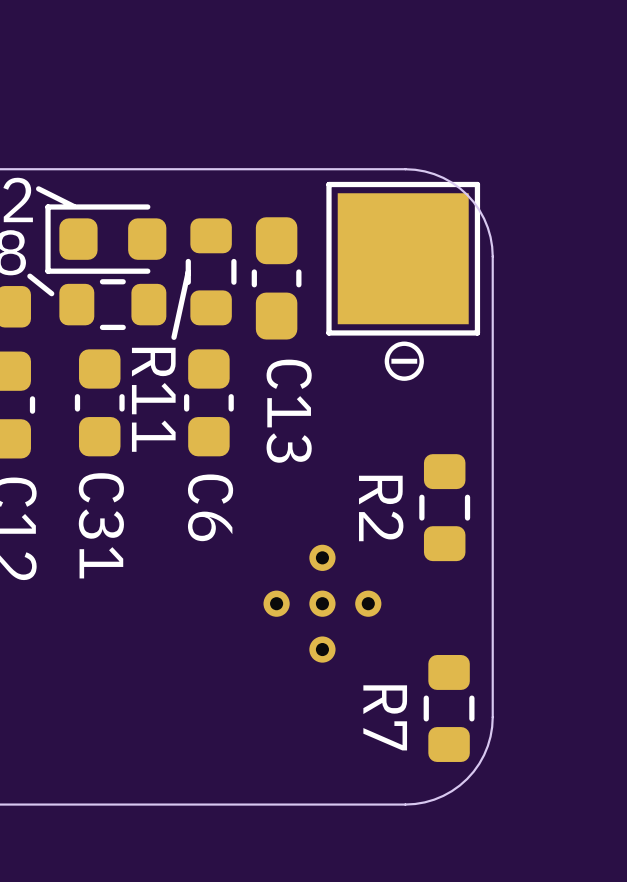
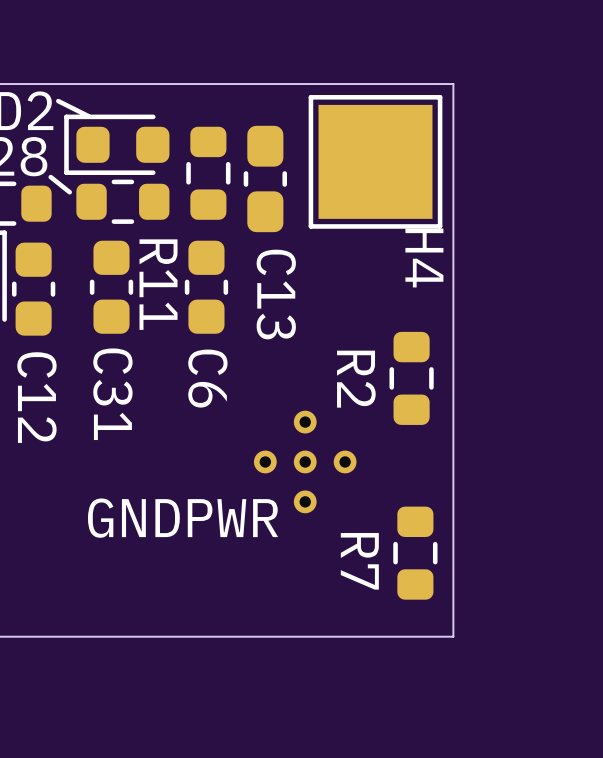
board edge: (405, 169) (424, 171) (443, 177) (467, 194) (484, 218) (490, 237) (492, 256) -> (377, 84) (453, 84) (453, 159)
line: (188, 271) (173, 337) -> none
text: ⊖ (404, 361) -> none
H4 name: none -> H4 (424, 257)
text: none -> GNDPWR (183, 518)
board edge: (492, 717) (490, 736) (484, 755) (467, 778) (451, 791) (434, 799) (405, 804) -> (453, 560) (453, 636) (377, 636)

